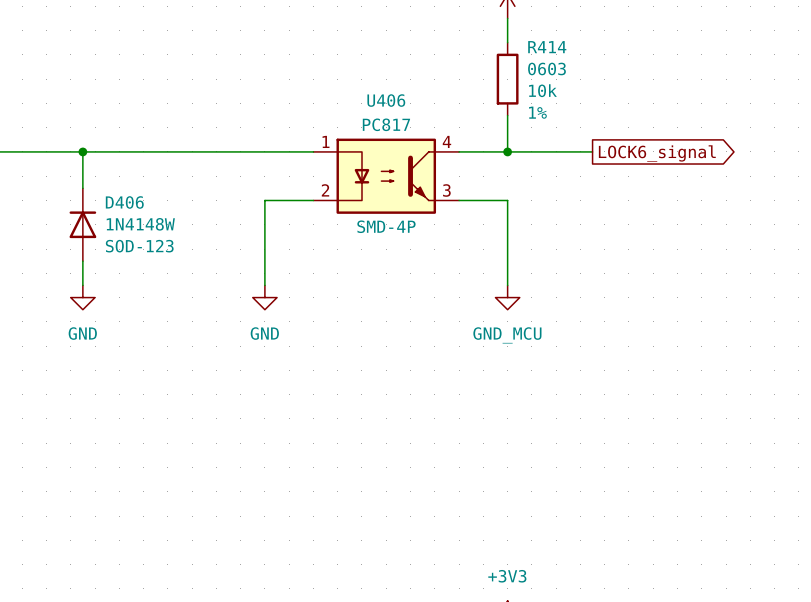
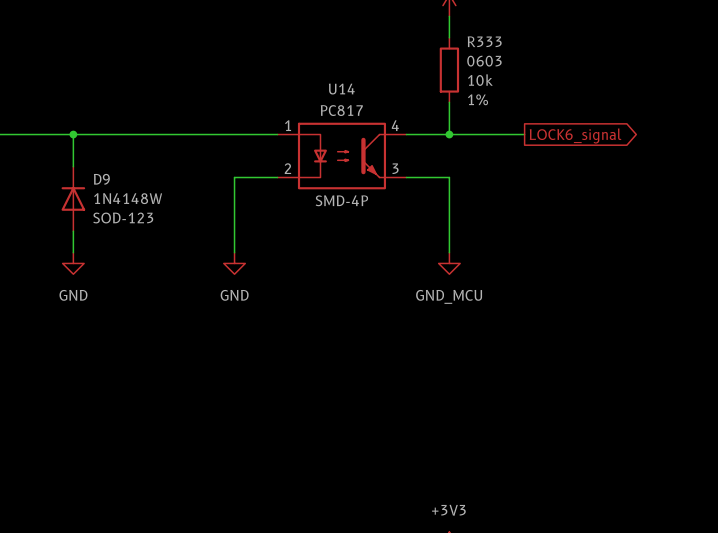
R414 name: R414 (547, 47) -> R333 (484, 41)
U406 name: U406 (386, 100) -> U14 (341, 89)
D406 name: D406 (124, 202) -> D9 (101, 179)

